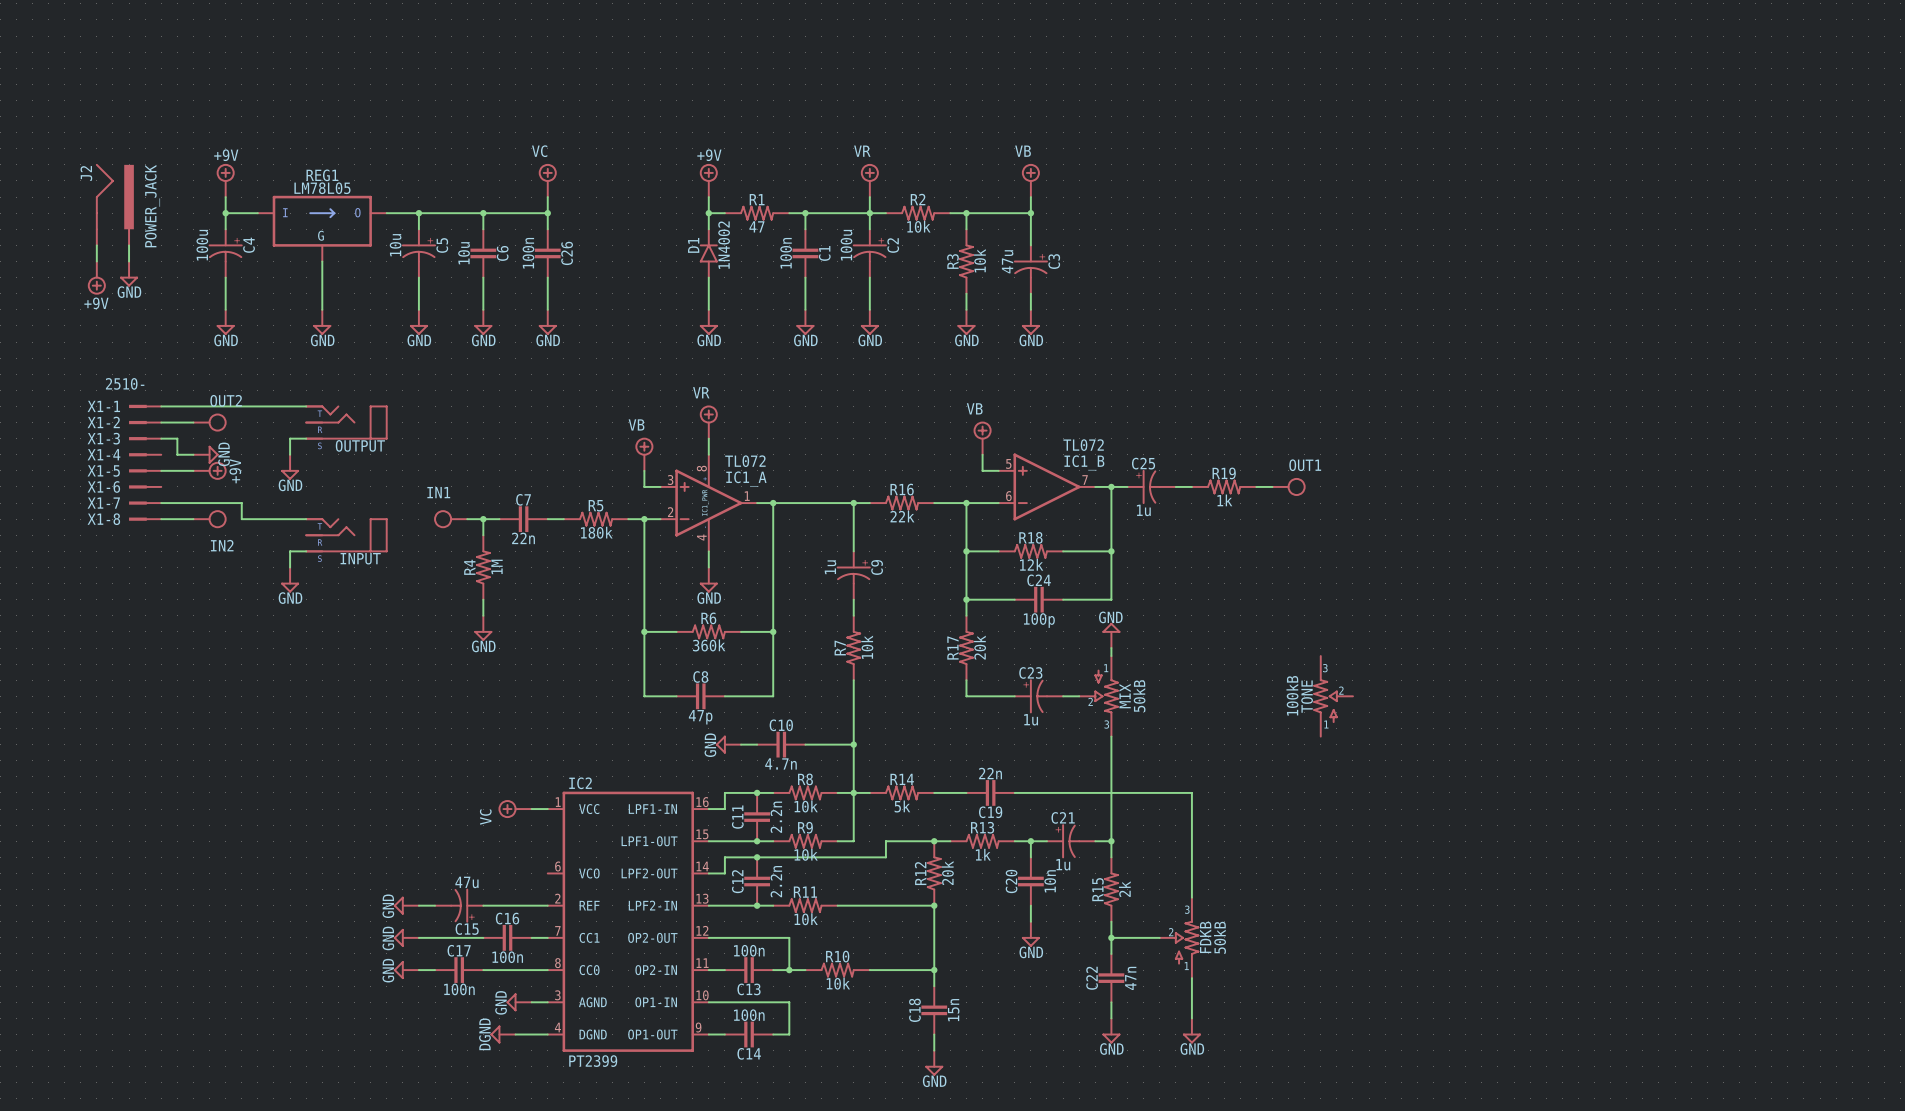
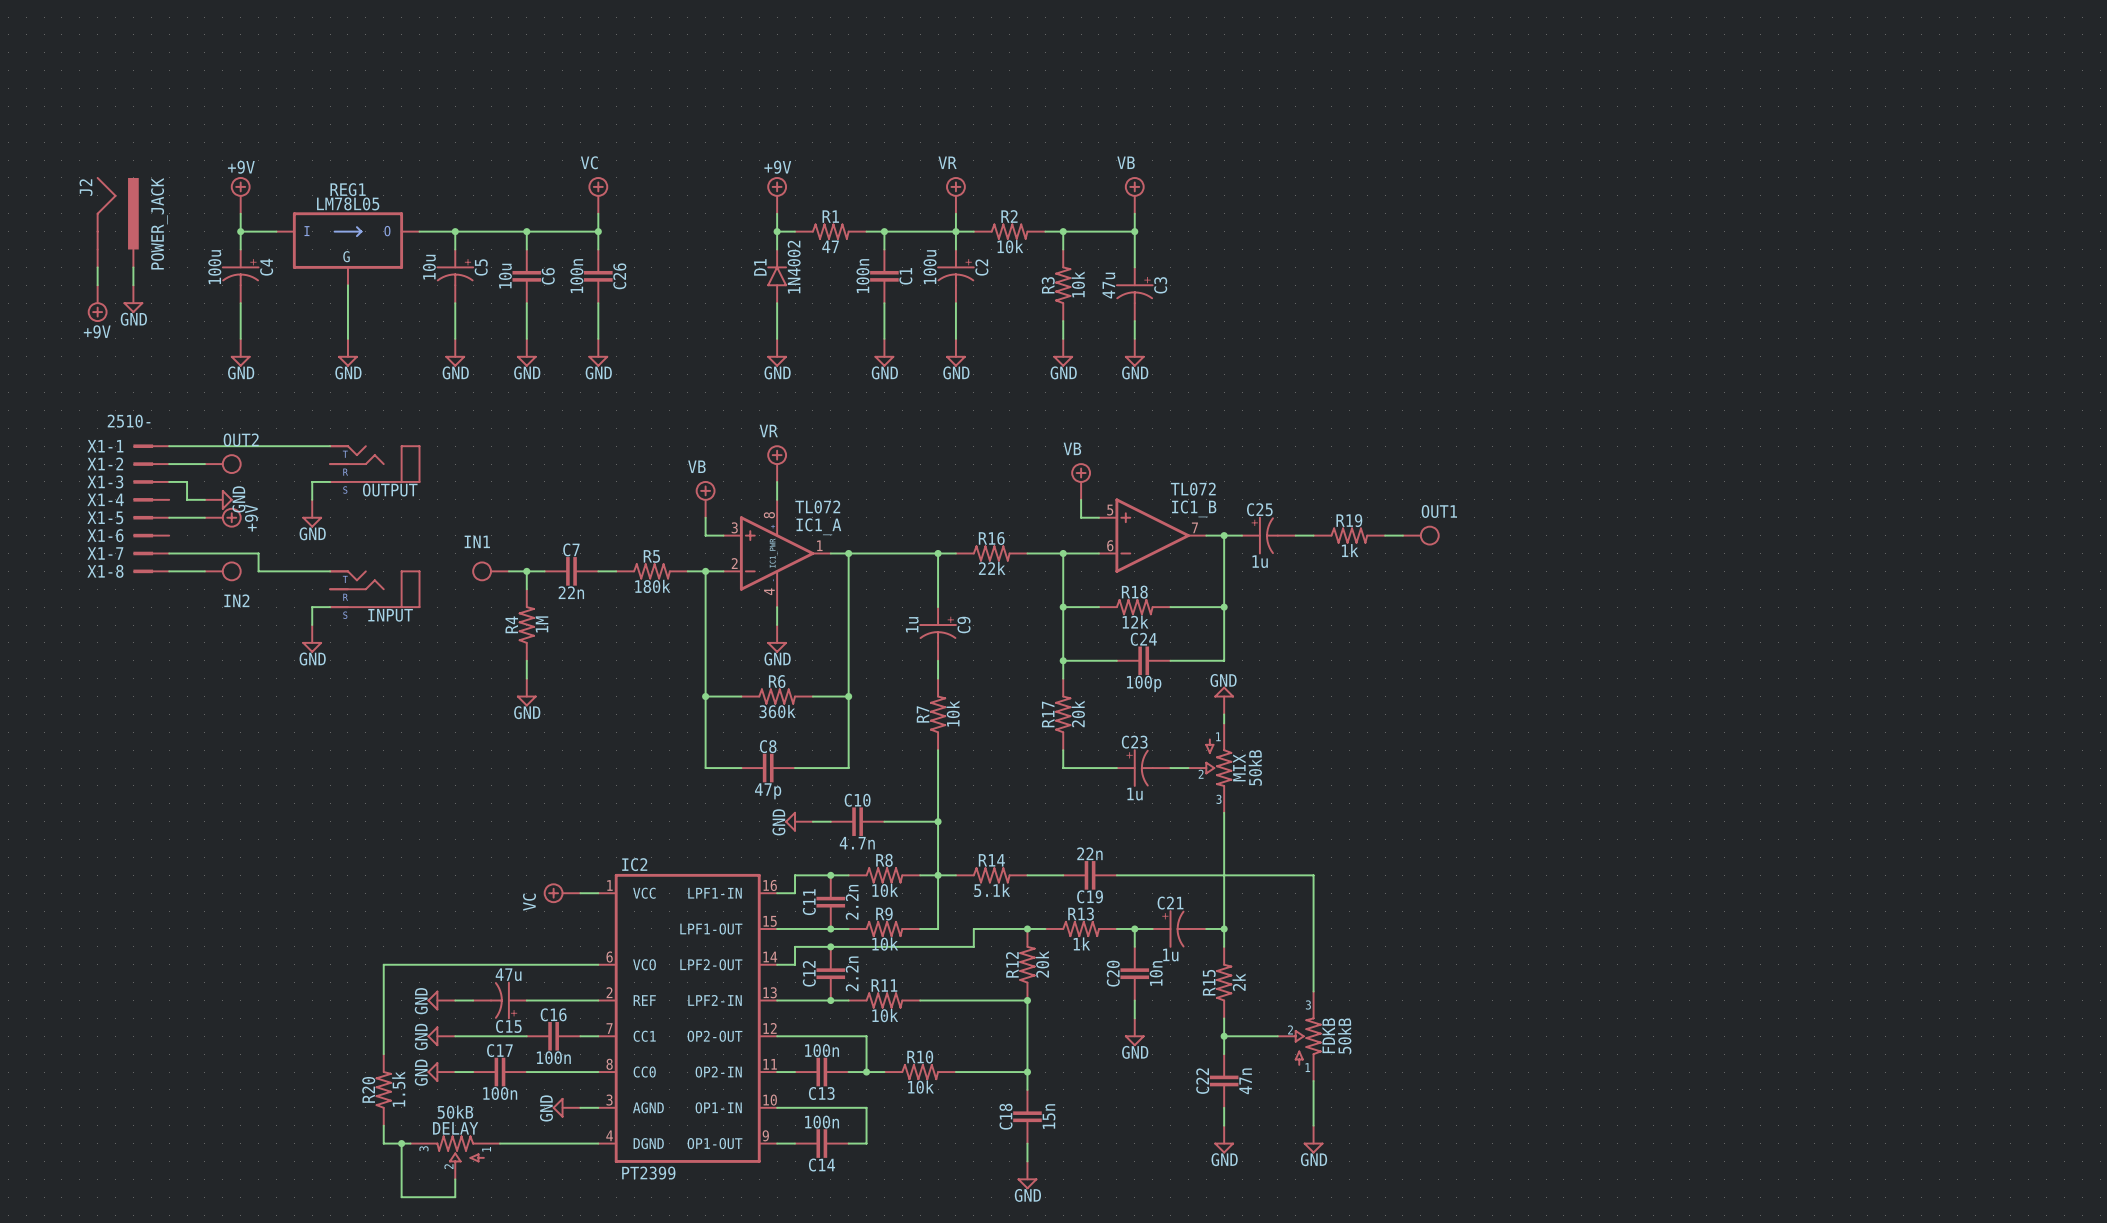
TONE: 100kB (1333, 696) -> none
R14 value: 5k (902, 806) -> 5.1k (992, 890)
wire: none -> (598, 964) (383, 964) (383, 1054)
R20: none -> 1.5k (383, 1089)
wire: none -> (383, 1125) (383, 1143) (410, 1143)
wire: none -> (401, 1143) (401, 1197) (455, 1197) (455, 1179)
junction: none -> (401, 1143)
wire: none -> (499, 1143) (562, 1143)
power symbol: DGND (503, 1034) -> none
DELAY: none -> 50kB (455, 1157)

